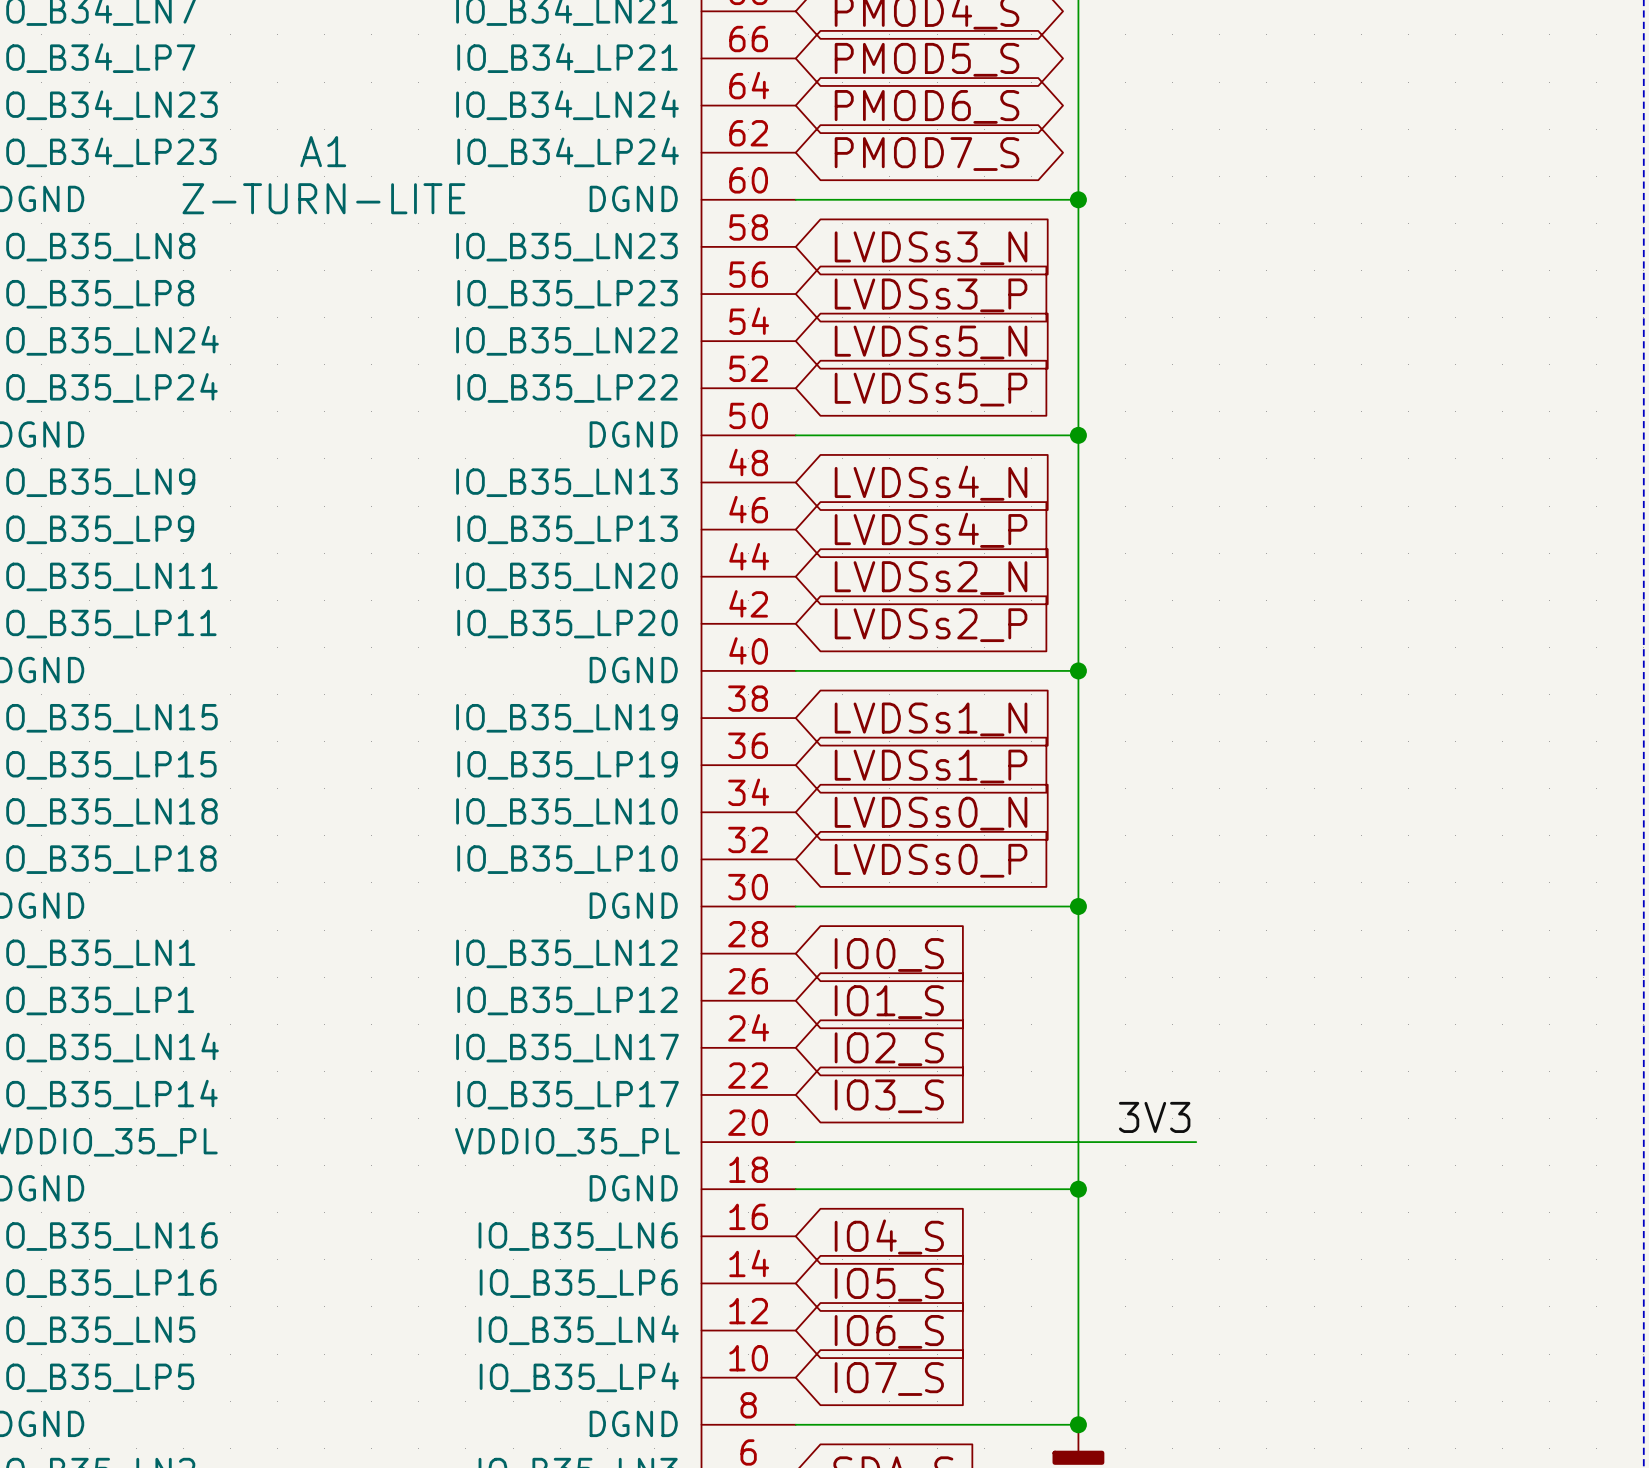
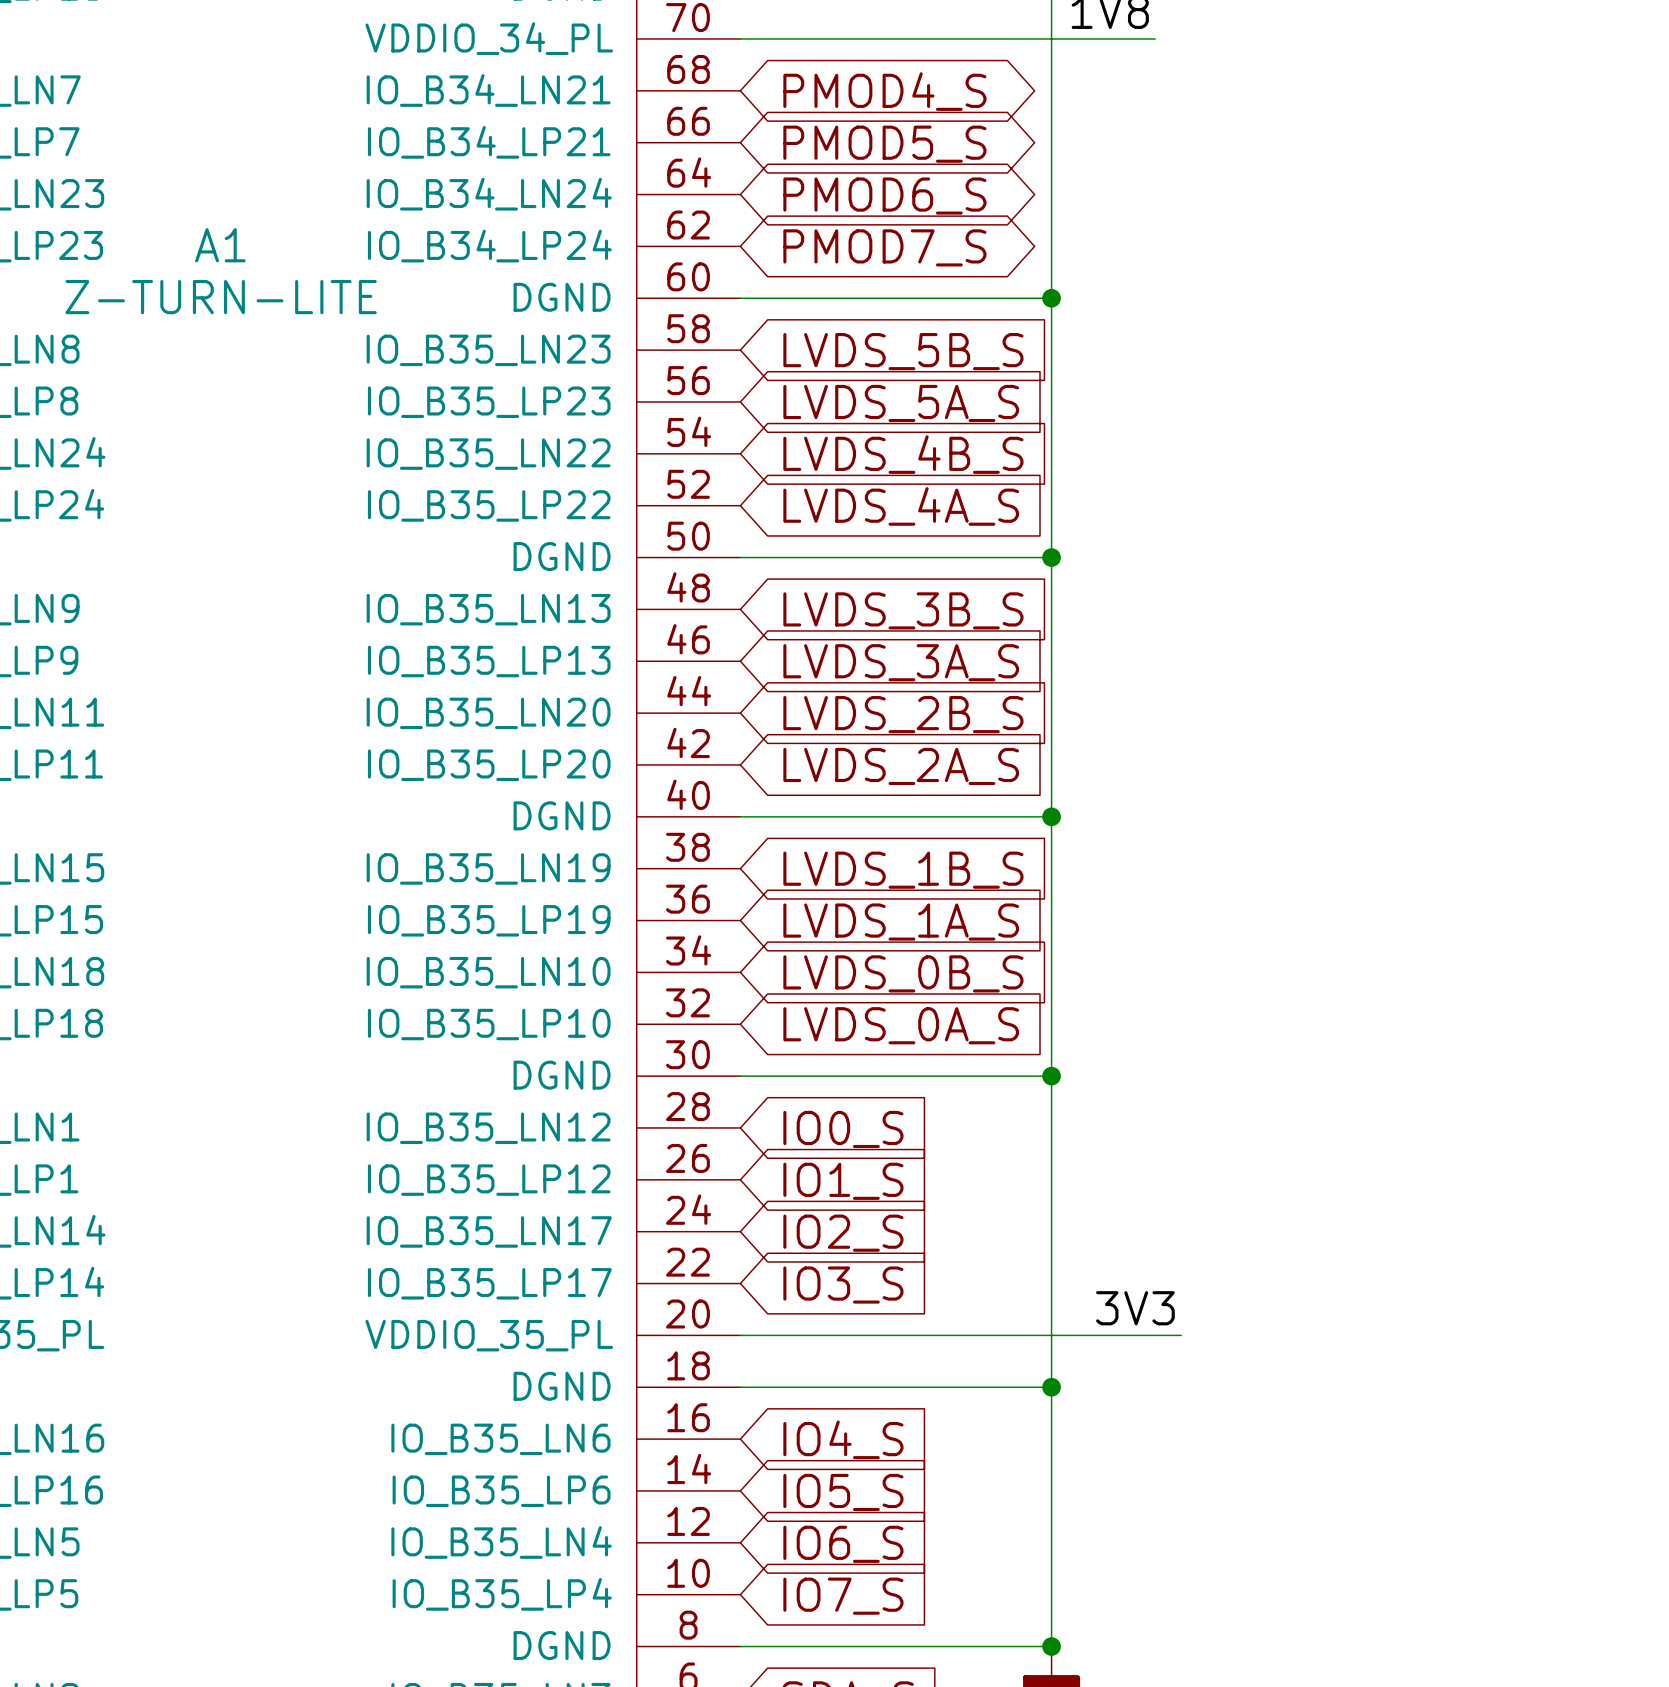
global label: LVDSs3_N (931, 248) -> LVDS_5B_S (903, 351)
global label: LVDSs3_P (931, 295) -> LVDS_5A_S (901, 403)
global label: LVDSs5_N (931, 342) -> LVDS_4B_S (903, 454)
global label: LVDSs5_P (931, 389) -> LVDS_4A_S (901, 506)
global label: LVDSs4_N (931, 483) -> LVDS_3B_S (903, 610)
global label: LVDSs4_P (931, 530) -> LVDS_3A_S (901, 662)
global label: LVDSs2_N (931, 578) -> LVDS_2B_S (903, 714)
global label: LVDSs2_P (931, 625) -> LVDS_2A_S (901, 766)
global label: LVDSs1_N (931, 719) -> LVDS_1B_S (903, 870)
global label: LVDSs1_P (931, 766) -> LVDS_1A_S (901, 922)
global label: LVDSs0_N (931, 813) -> LVDS_0B_S (903, 973)
global label: LVDSs0_P (931, 860) -> LVDS_0A_S (901, 1025)

